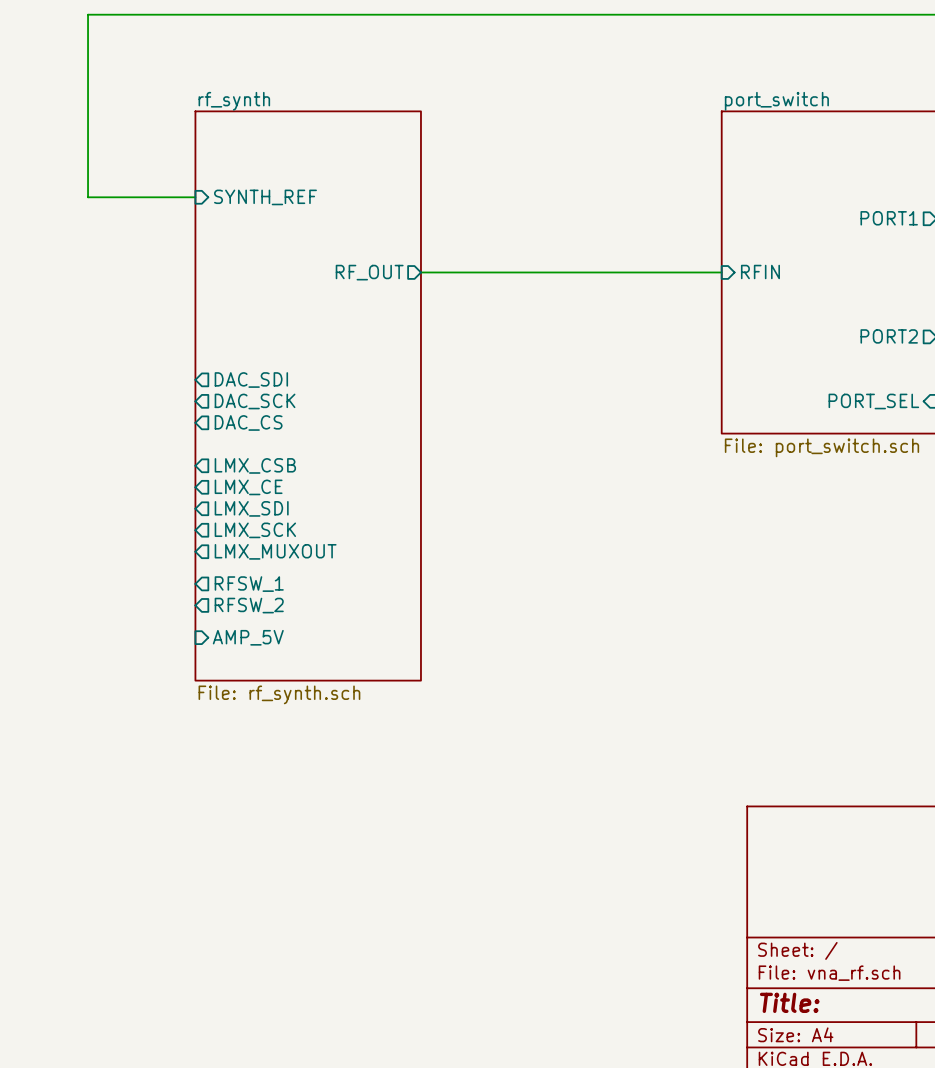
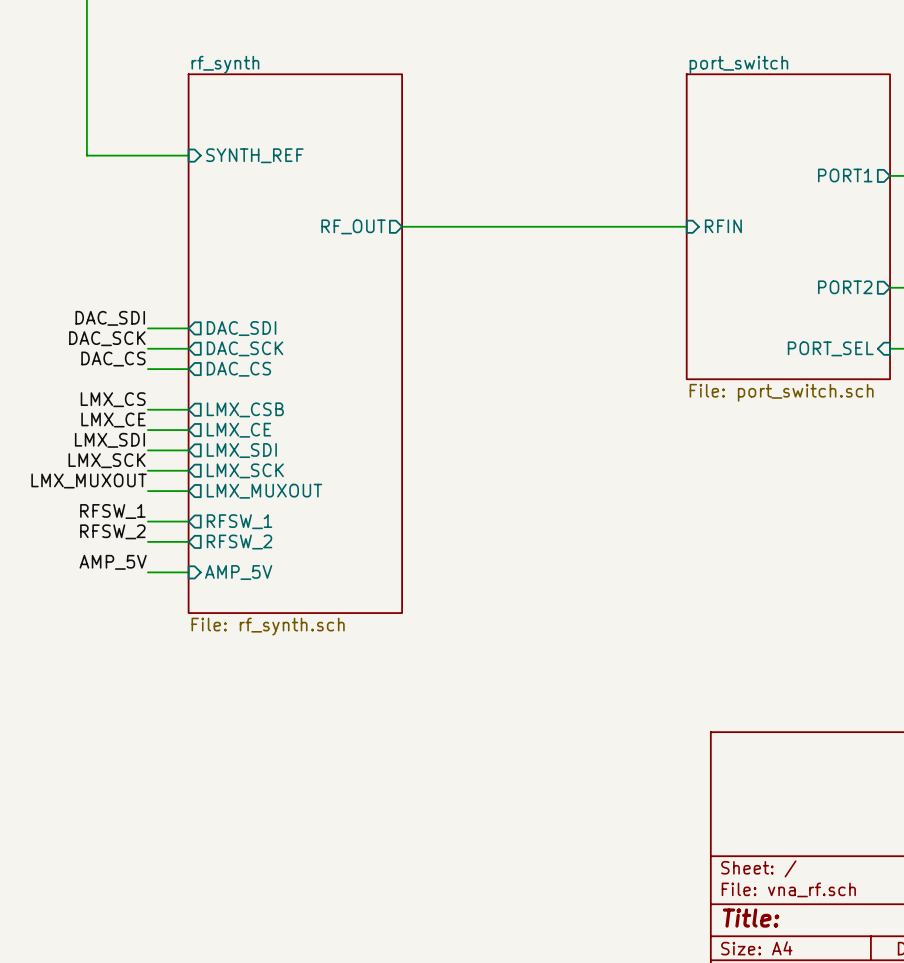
label: none -> DAC_SDI (110, 318)
wire: none -> (147, 328) (188, 328)
label: none -> DAC_SCK (107, 338)
wire: none -> (147, 348) (188, 348)
label: none -> DAC_CS (113, 359)
wire: none -> (147, 369) (188, 369)
label: none -> LMX_CS (113, 399)
wire: none -> (147, 409) (188, 409)
label: none -> LMX_CE (113, 420)
wire: none -> (147, 430) (188, 430)
label: none -> LMX_SDI (109, 440)
wire: none -> (147, 450) (188, 450)
label: none -> LMX_SCK (107, 460)
wire: none -> (147, 470) (188, 470)
label: none -> LMX_MUXOUT (89, 481)
wire: none -> (147, 491) (188, 491)
label: none -> RFSW_1 (112, 511)
wire: none -> (147, 521) (188, 521)
label: none -> RFSW_2 (112, 531)
wire: none -> (147, 541) (188, 541)
label: none -> AMP_5V (113, 562)
wire: none -> (147, 572) (188, 572)

